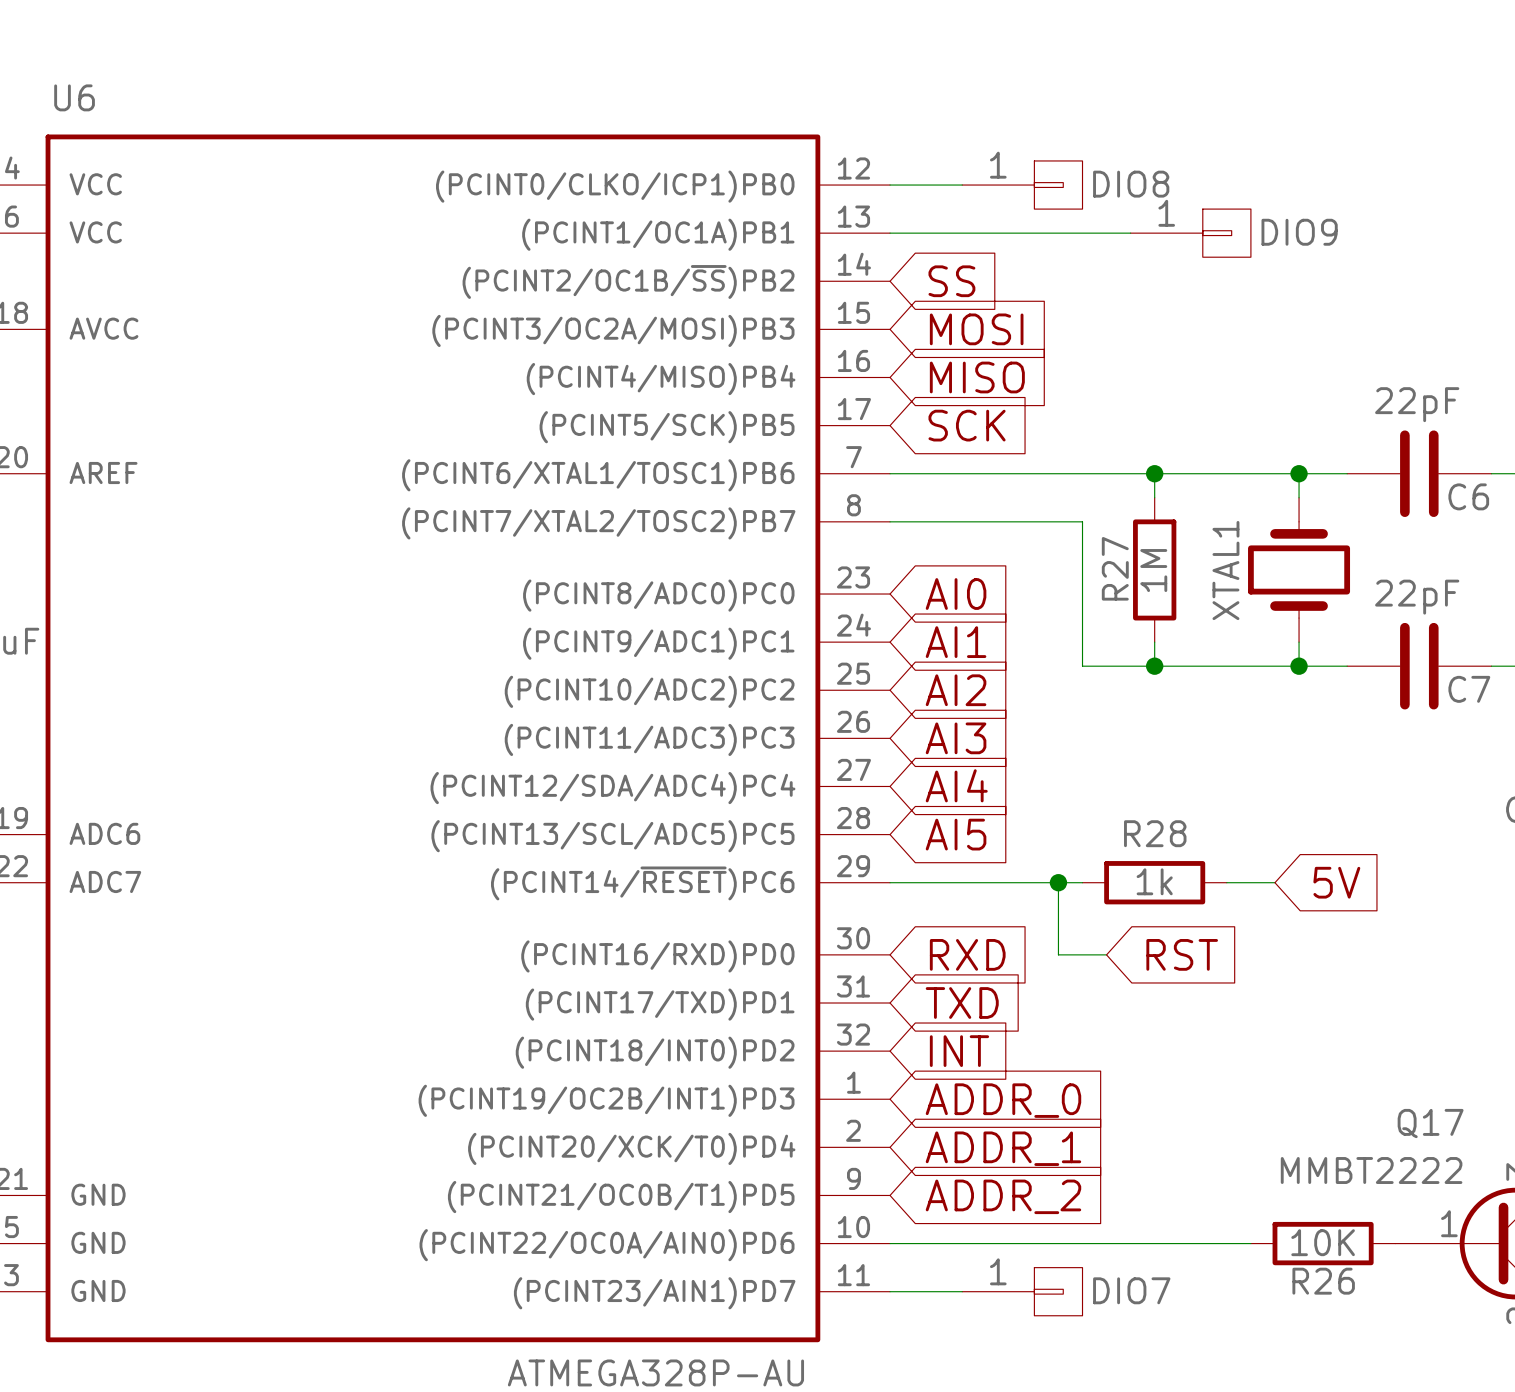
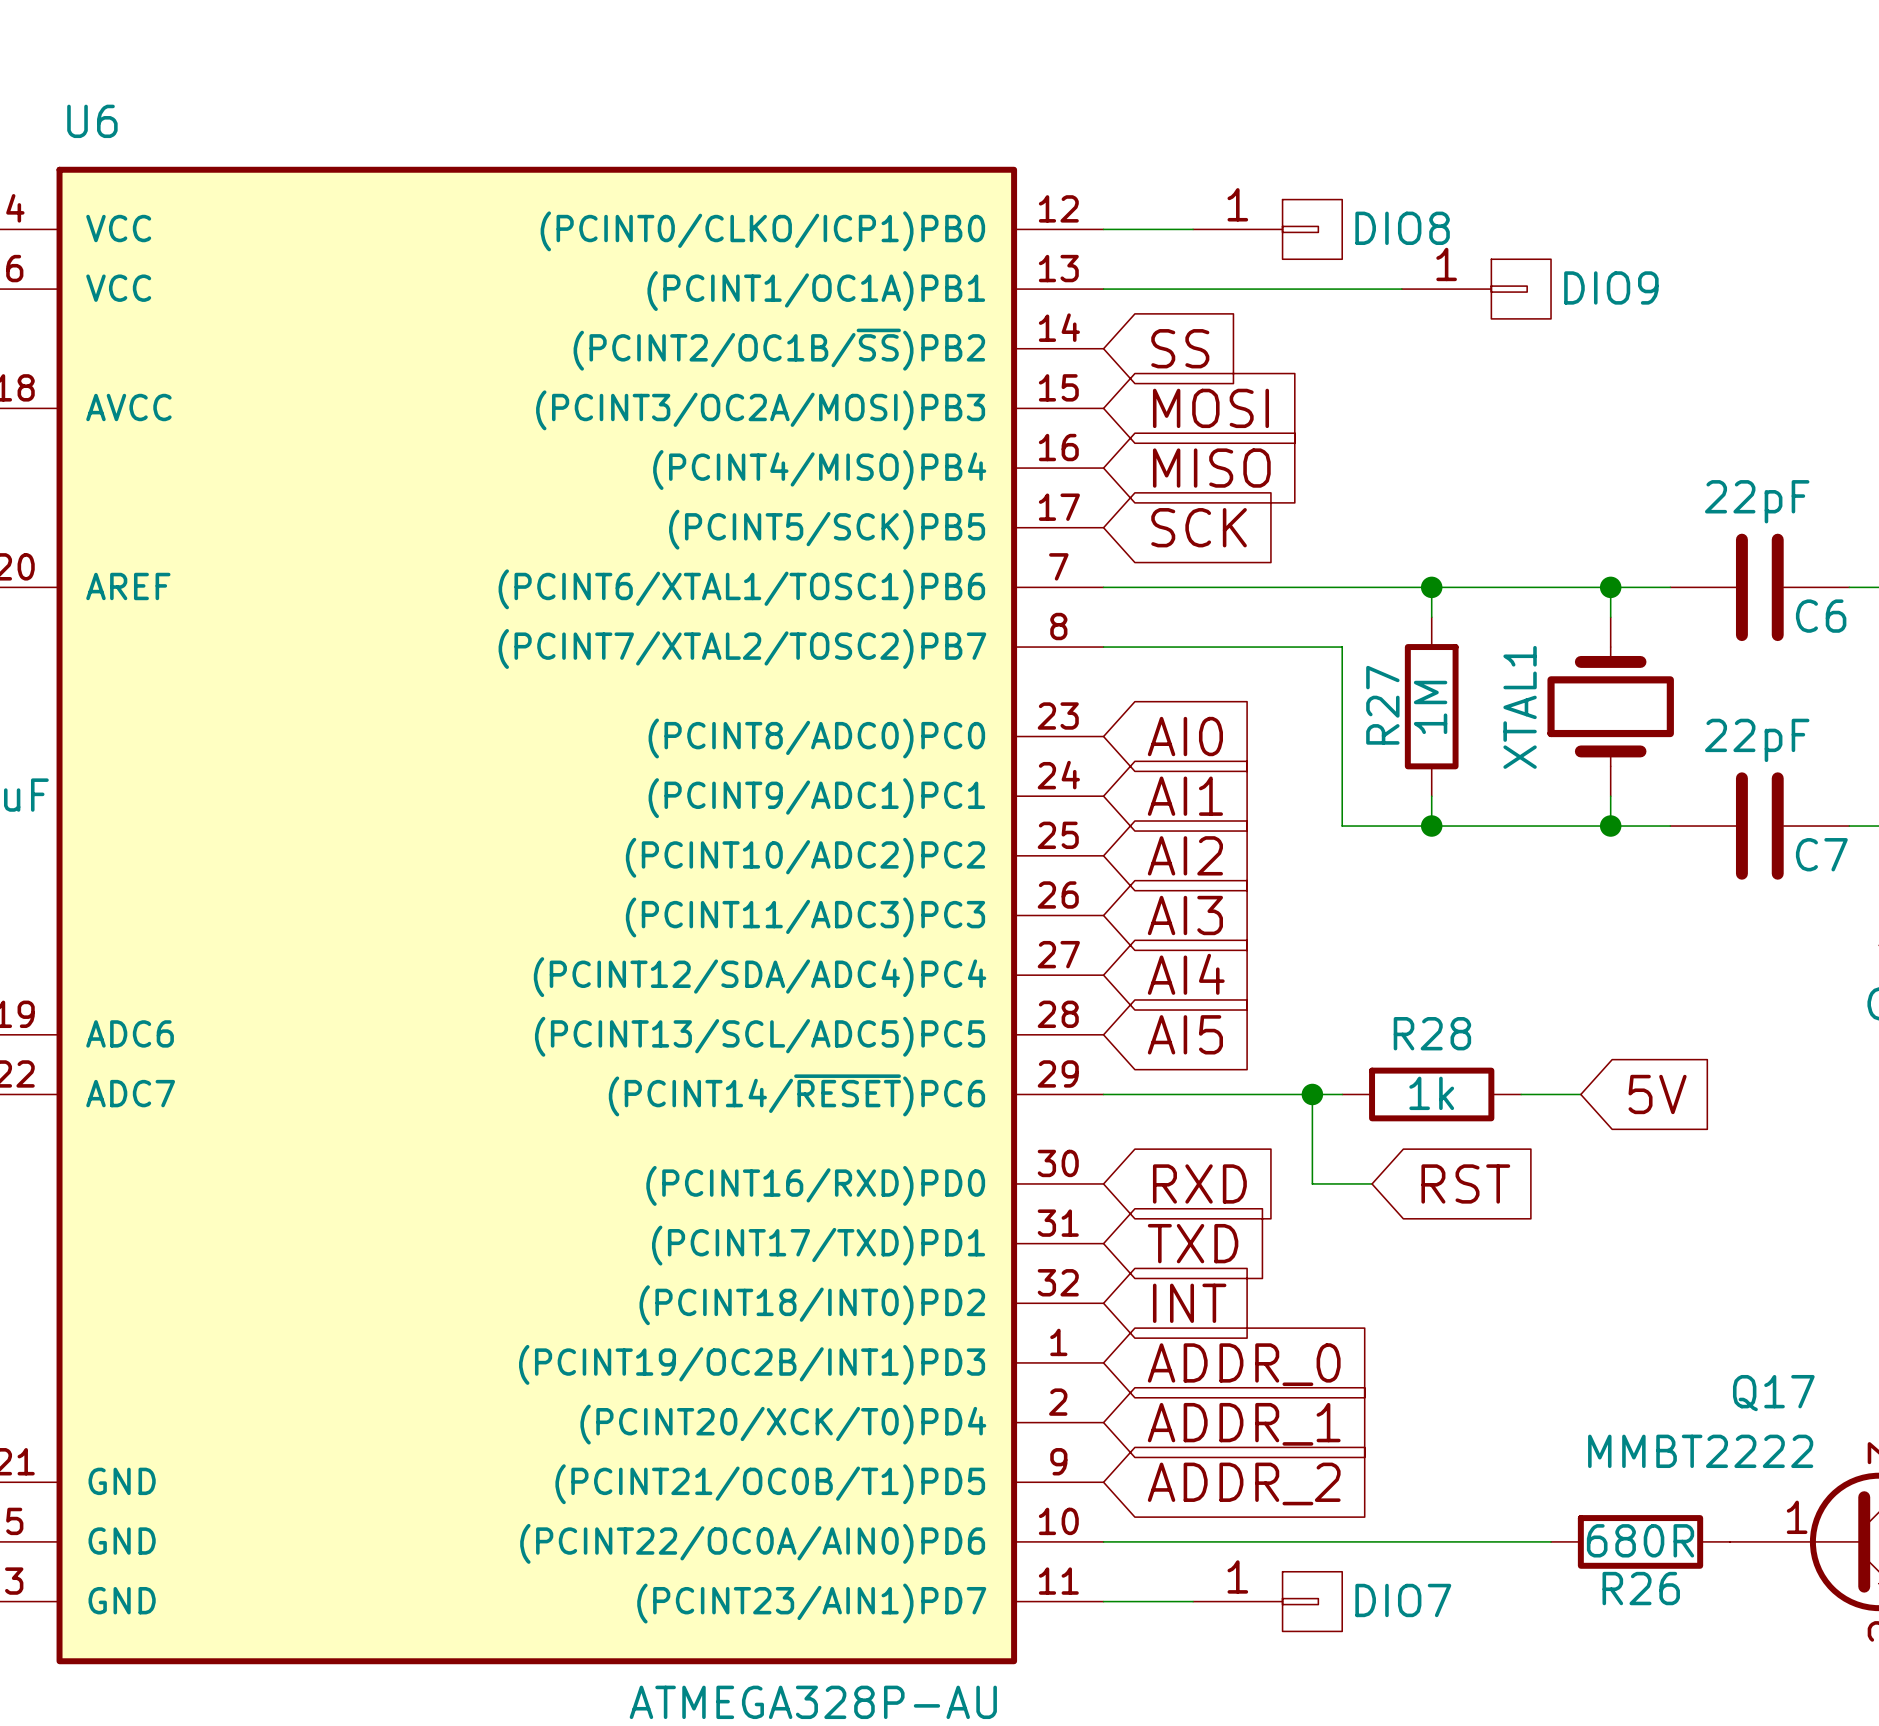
R26 value: 10K (1323, 1242) -> 680R (1640, 1540)

